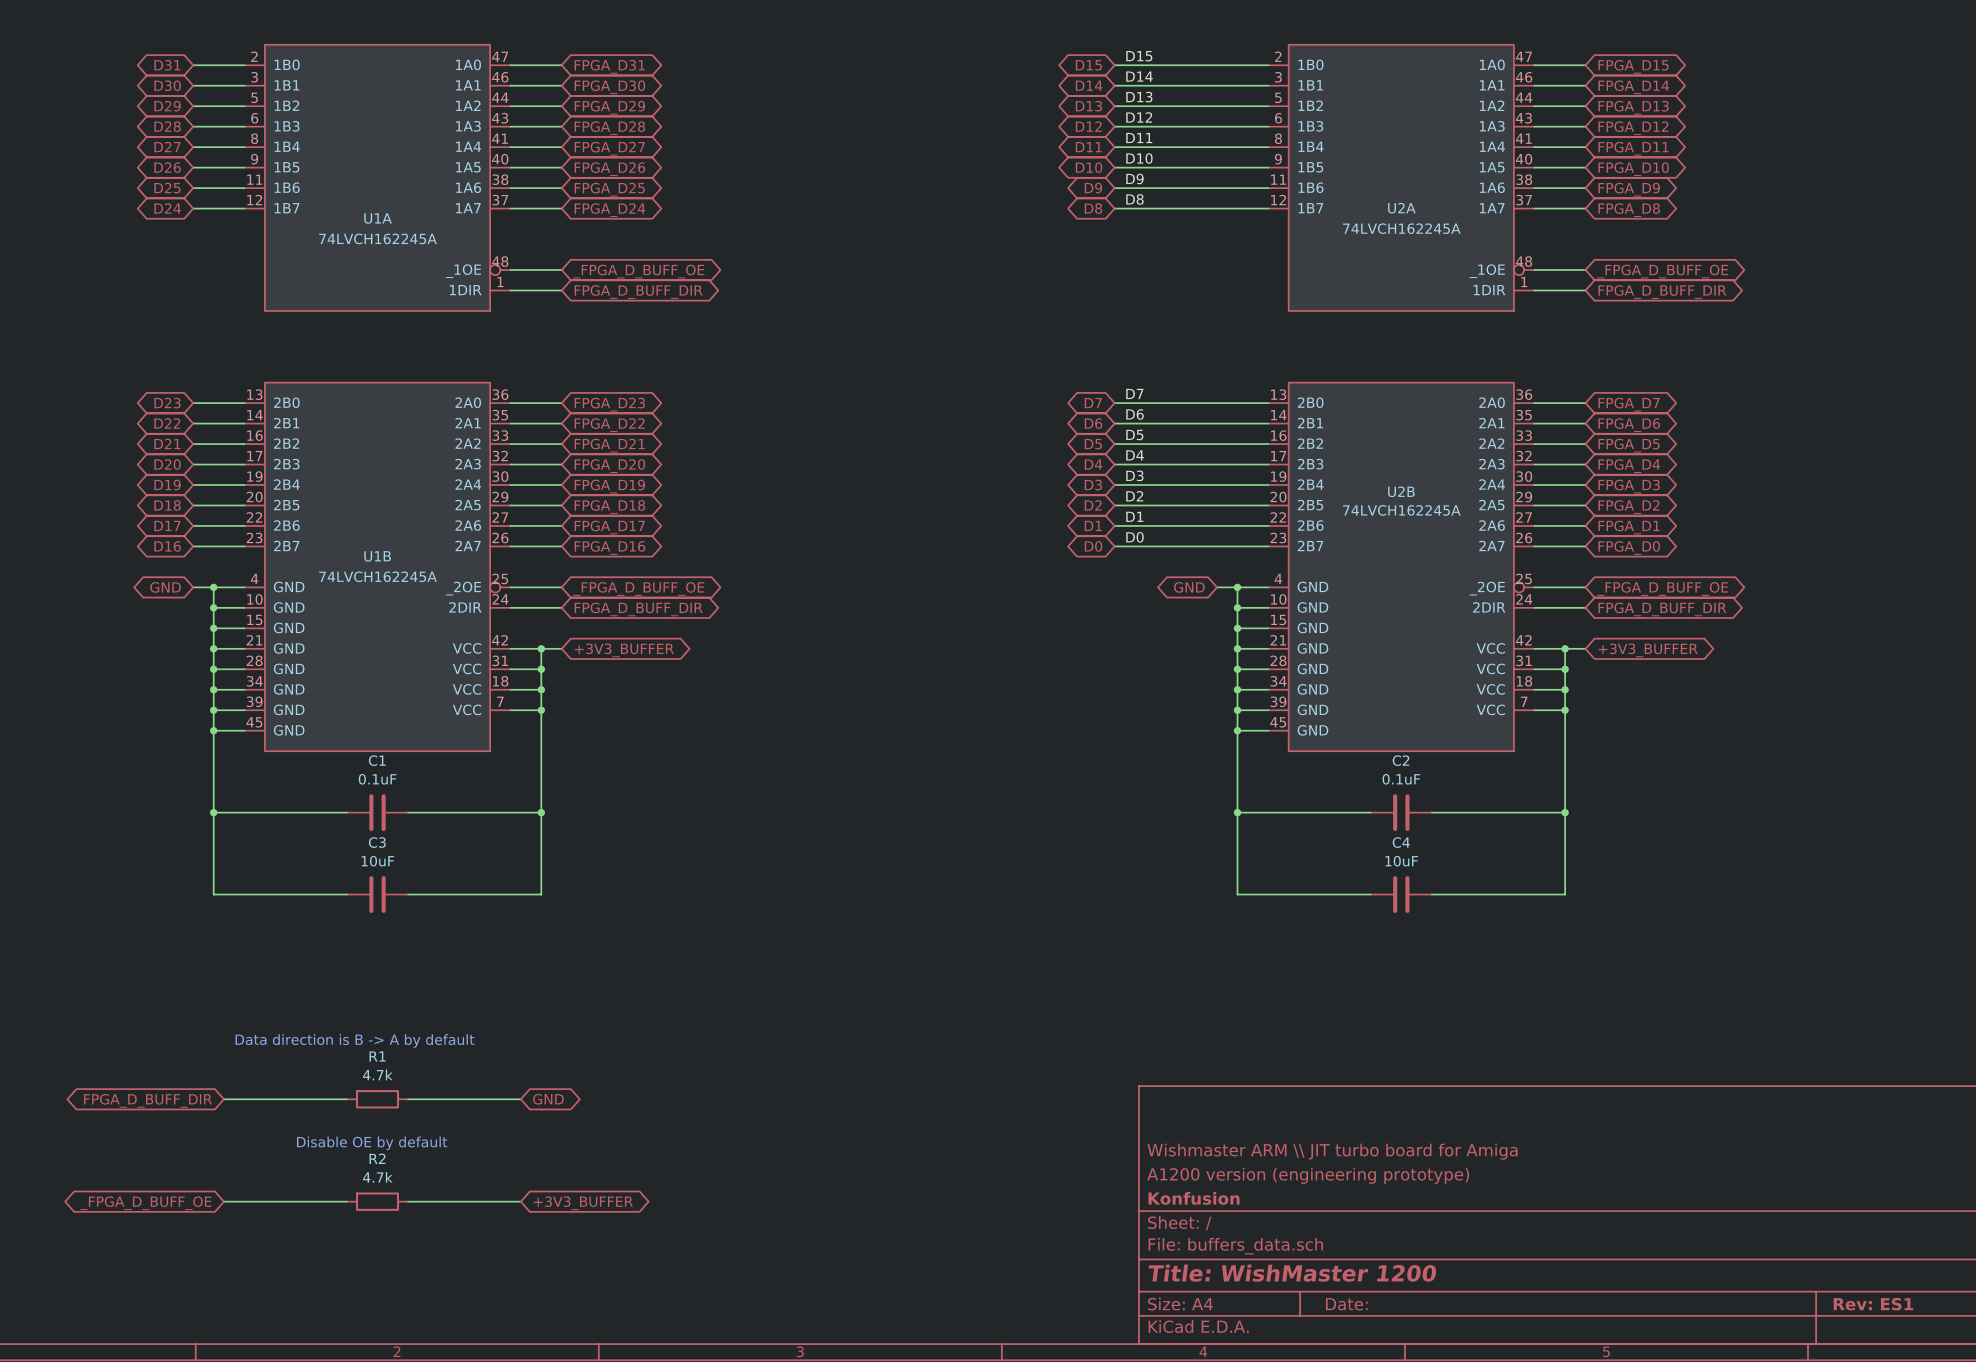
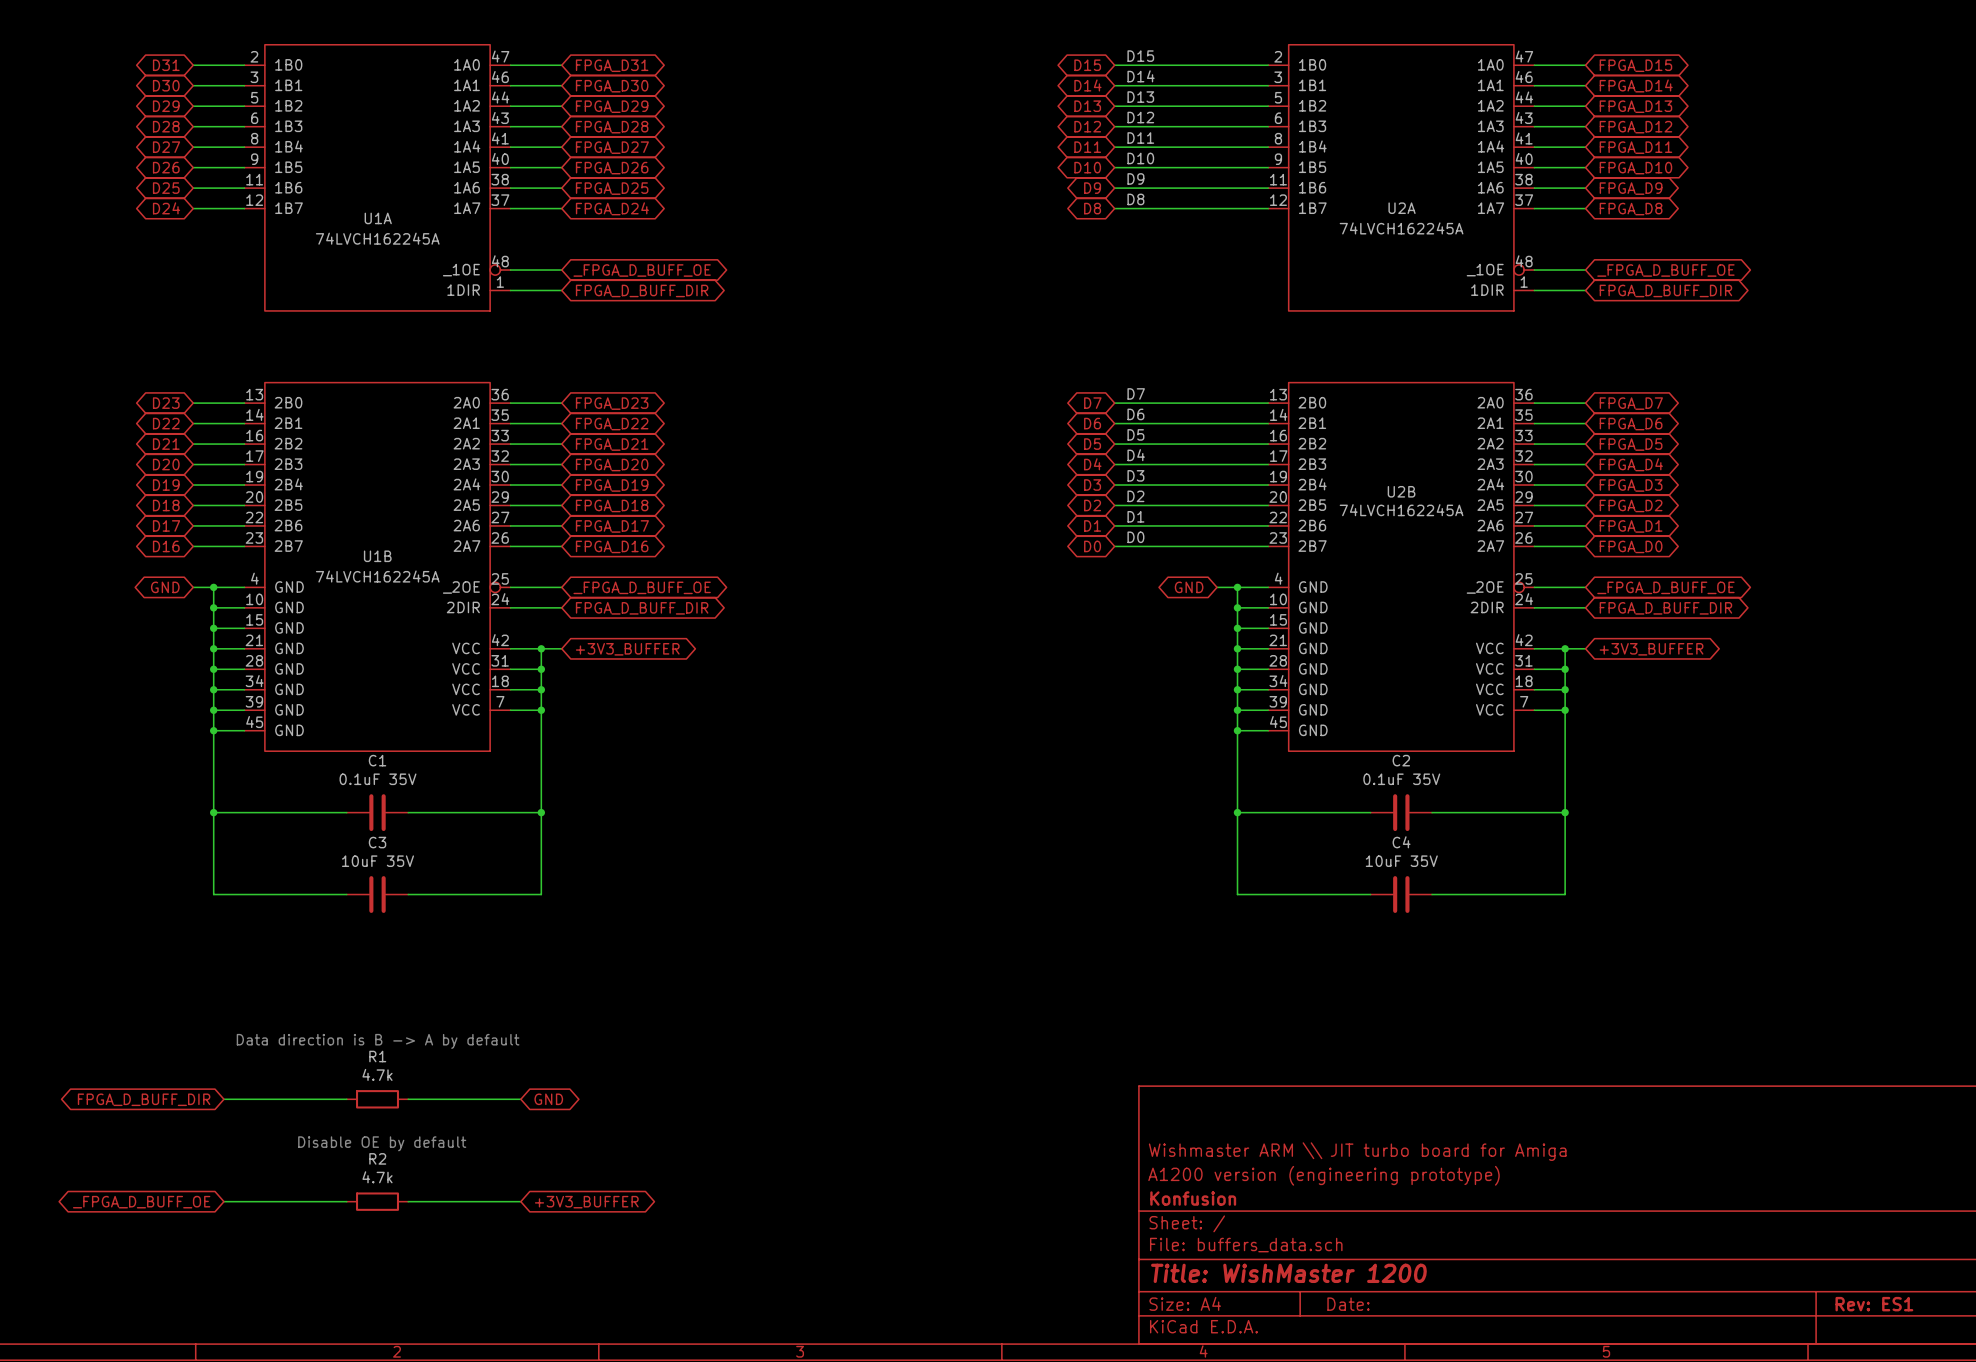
C1 value: 0.1uF (377, 779) -> 0.1uF 35V (377, 779)
C2 value: 0.1uF (1401, 779) -> 0.1uF 35V (1401, 779)
C3 value: 10uF (377, 861) -> 10uF 35V (377, 861)
C4 value: 10uF (1401, 861) -> 10uF 35V (1401, 861)

